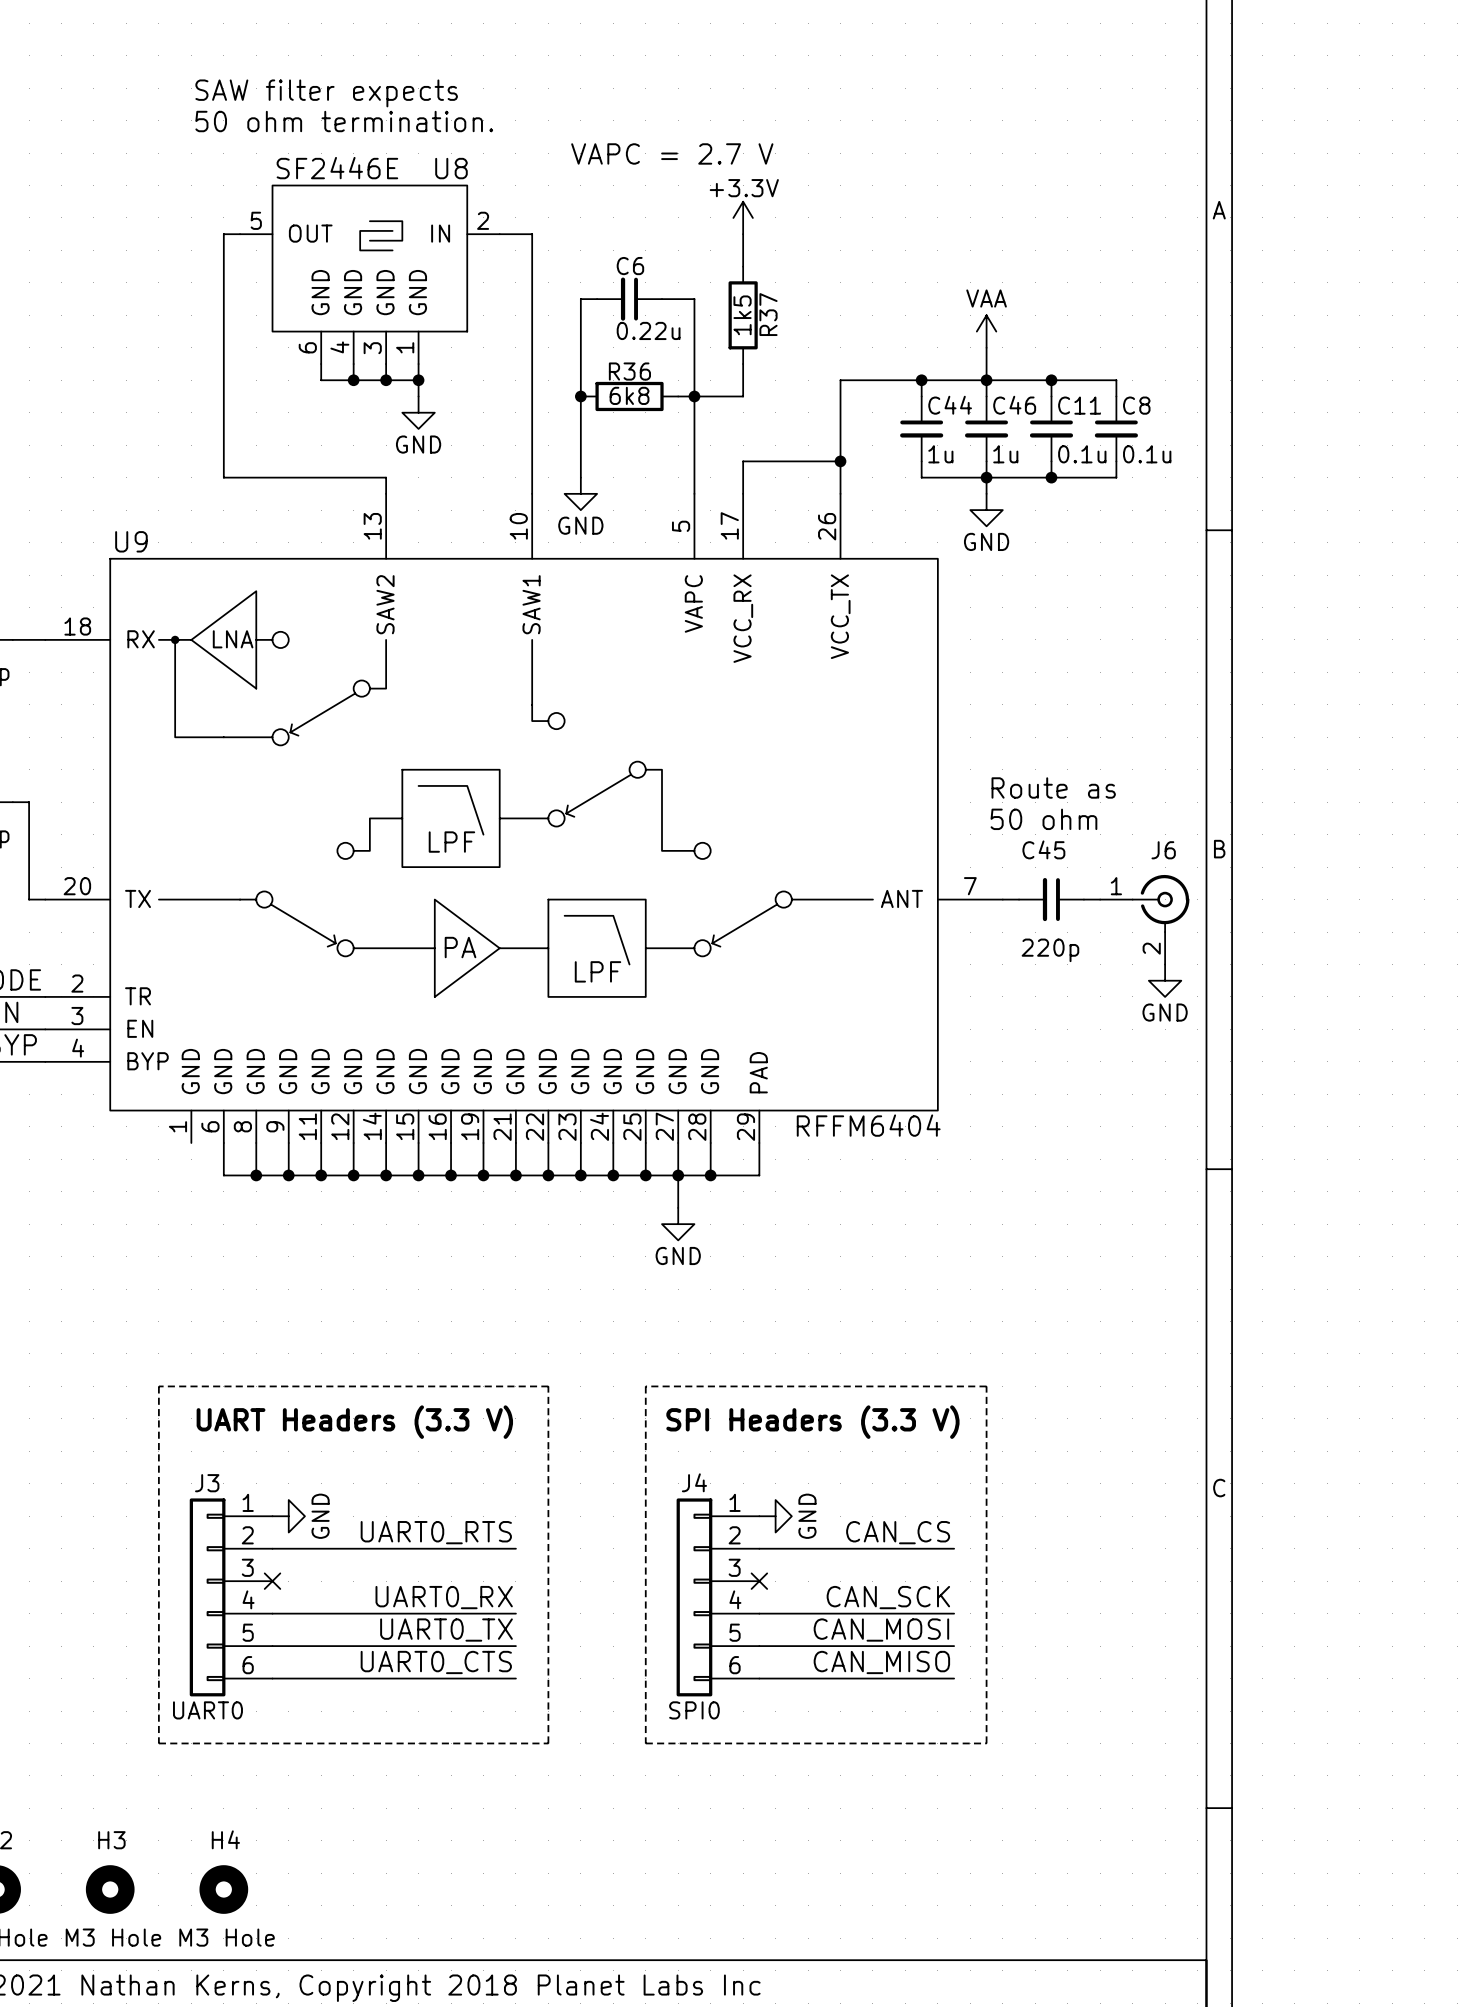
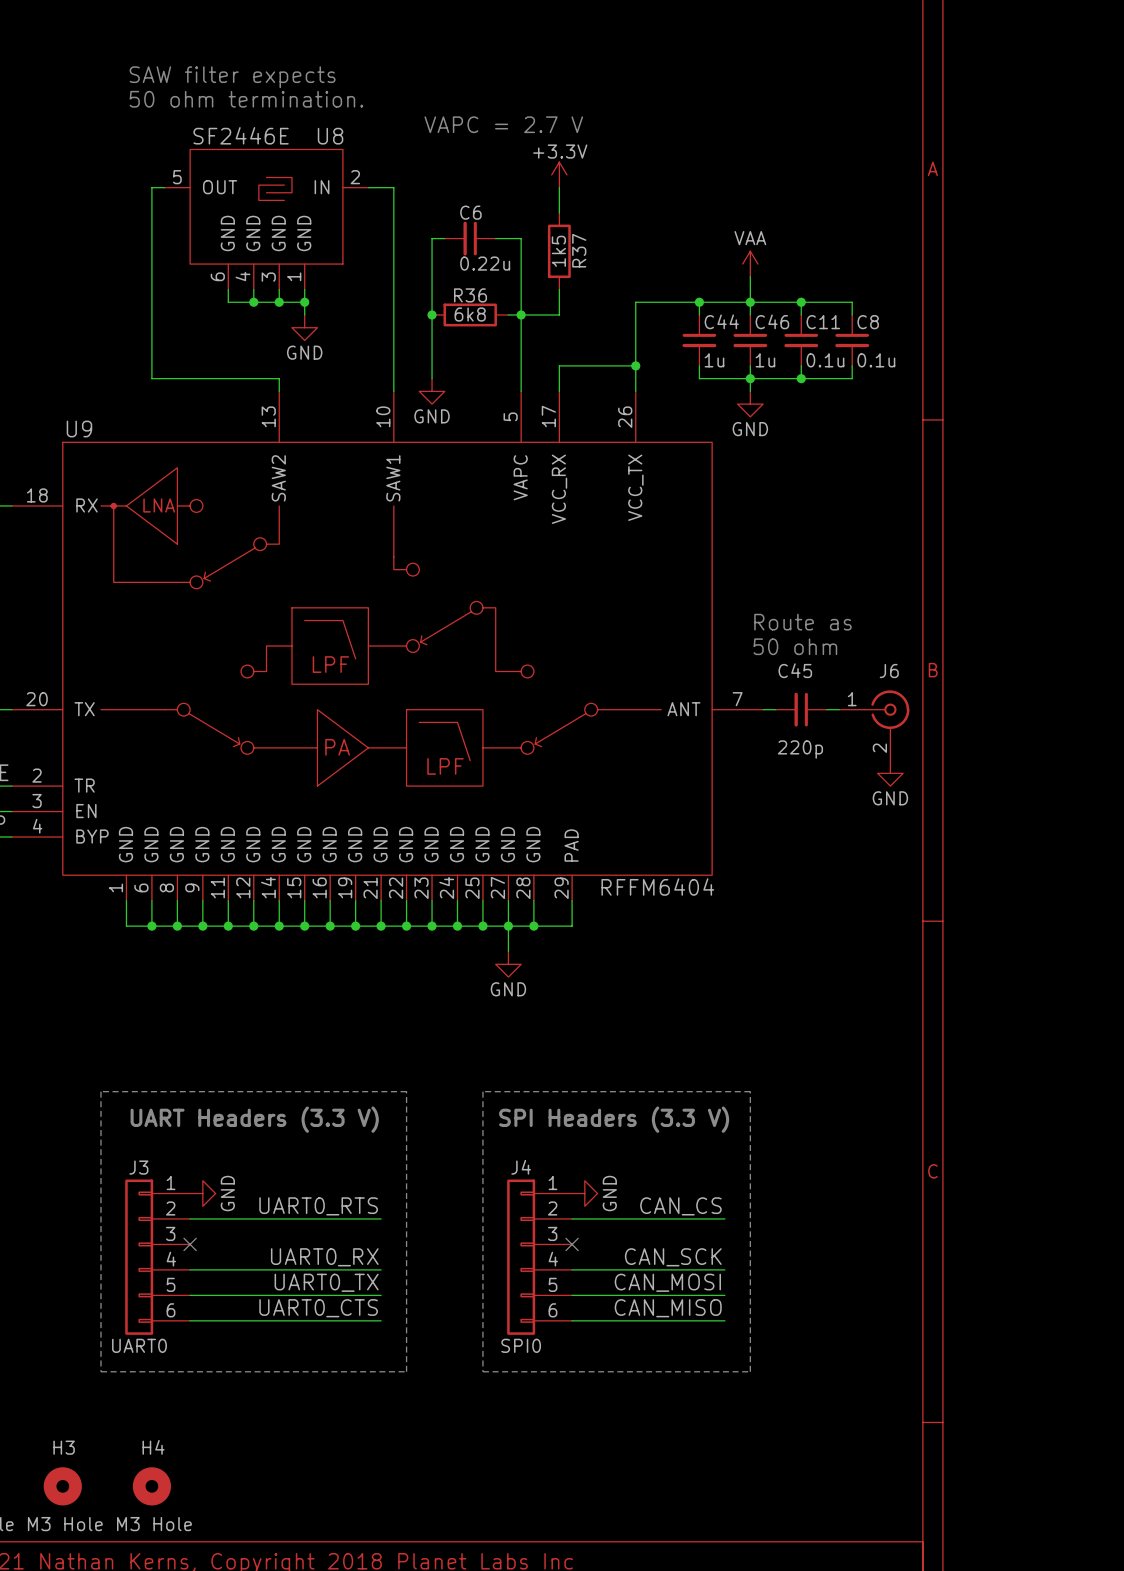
wire: none -> (126, 900) (126, 926) (151, 926)
junction: none -> (151, 926)

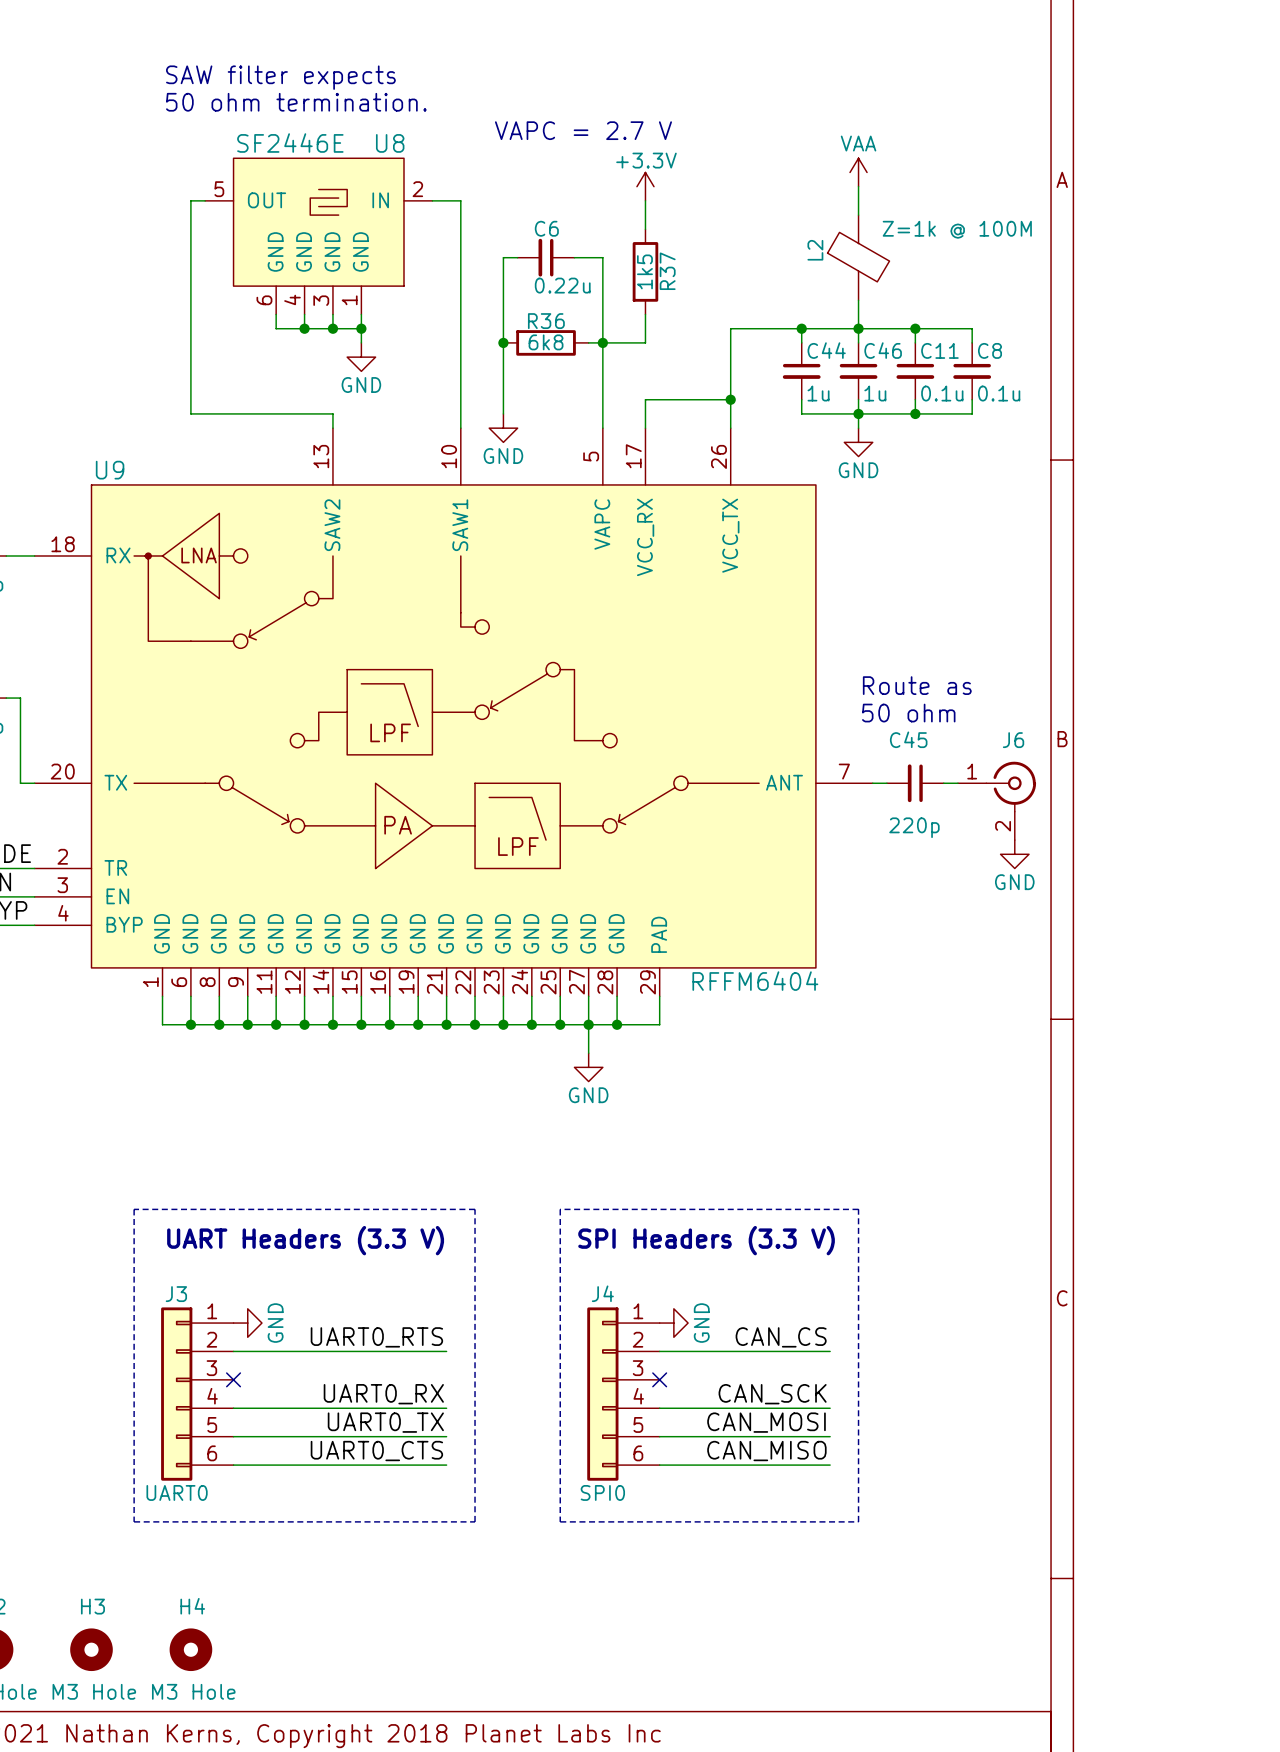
wire: none -> (858, 186) (858, 215)
L2: none -> Z=1k @ 100M (858, 257)
power symbol position: VAA (750, 264) -> VAA (858, 172)

